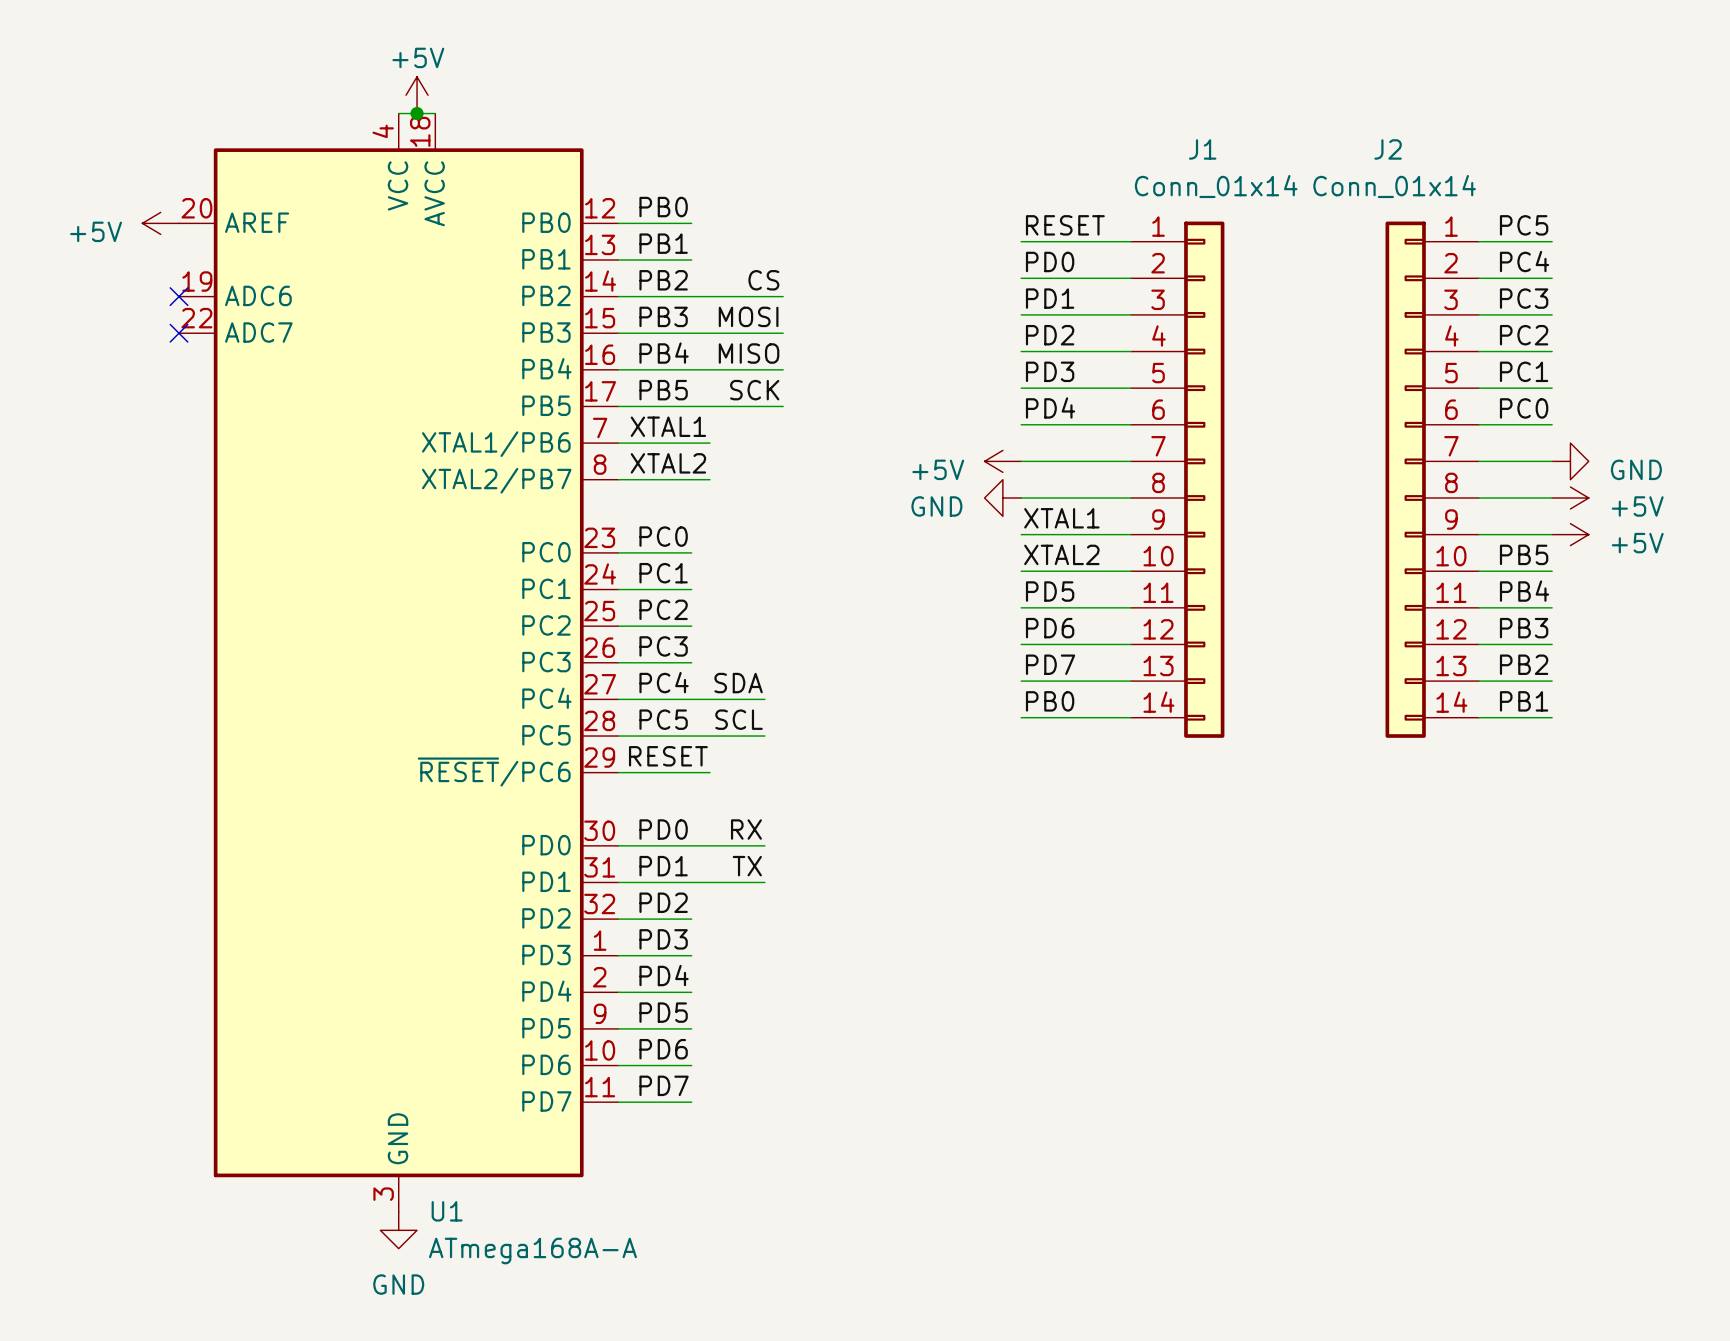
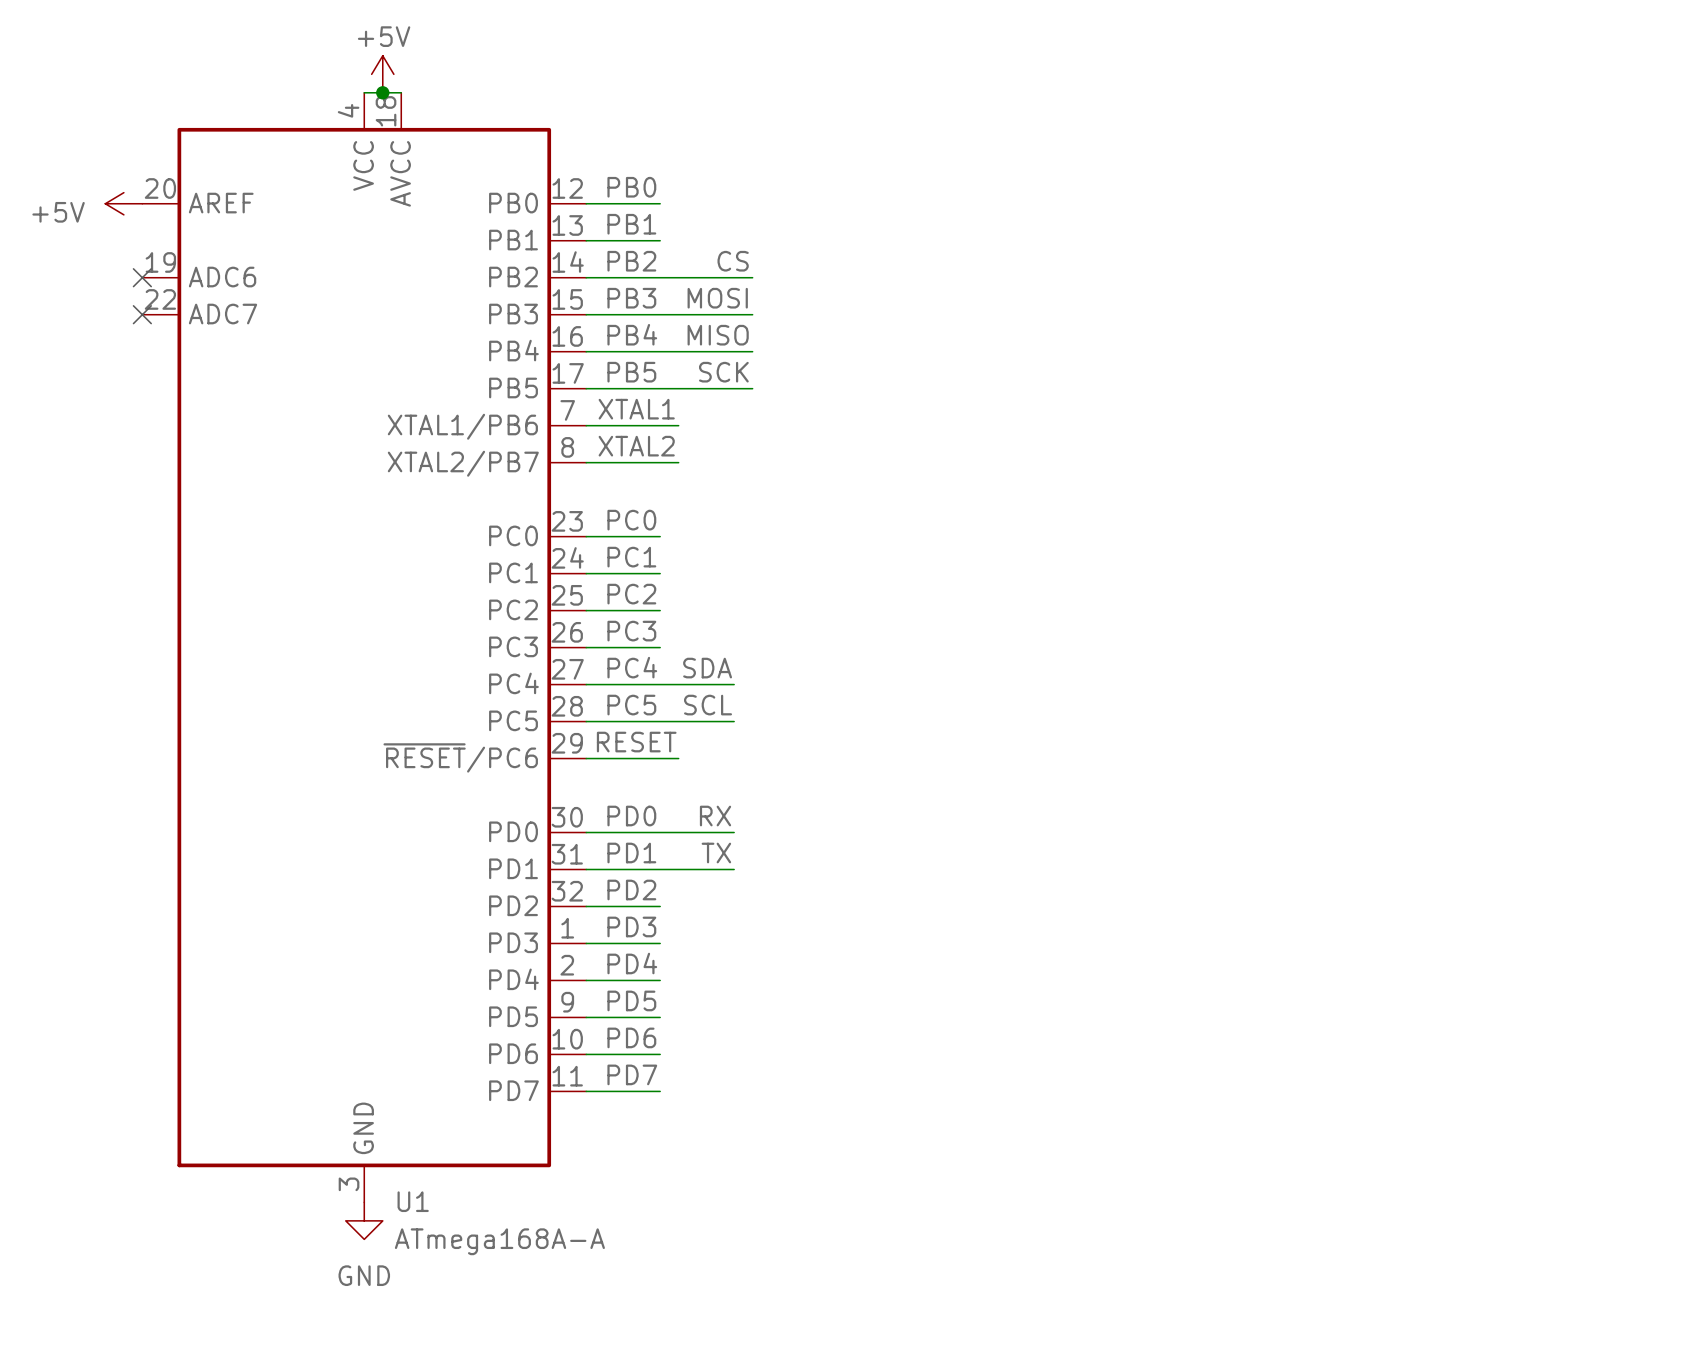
label: RESET (1065, 225) -> none
label: PC5 (1524, 225) -> none
wire: (1021, 241) (1131, 241) -> none
wire: (1478, 241) (1552, 241) -> none
label: PD0 (1050, 261) -> none
label: PC4 (1524, 261) -> none
wire: (1021, 278) (1131, 278) -> none
wire: (1478, 278) (1552, 278) -> none
label: PD1 (1050, 298) -> none
label: PC3 (1524, 298) -> none
wire: (1021, 314) (1131, 314) -> none
wire: (1478, 314) (1552, 314) -> none
label: PD2 (1050, 335) -> none
label: PC2 (1524, 335) -> none
wire: (1021, 351) (1131, 351) -> none
wire: (1478, 351) (1552, 351) -> none
label: PD3 (1050, 371) -> none
label: PC1 (1524, 371) -> none
wire: (1021, 388) (1131, 388) -> none
wire: (1478, 388) (1552, 388) -> none
label: PD4 (1050, 408) -> none
label: PC0 (1524, 408) -> none
wire: (1021, 424) (1131, 424) -> none
wire: (1478, 424) (1552, 424) -> none
power symbol: +5V (1002, 461) -> none
wire: (1021, 461) (1131, 461) -> none
wire: (1478, 461) (1552, 461) -> none
power symbol: GND (1570, 461) -> none
J1: Conn_01x14 (1177, 479) -> none
J2: Conn_01x14 (1432, 479) -> none
power symbol: GND (1002, 498) -> none
wire: (1021, 498) (1131, 498) -> none
wire: (1478, 498) (1552, 498) -> none
power symbol: +5V (1570, 498) -> none
label: XTAL1 (1061, 518) -> none
wire: (1021, 534) (1131, 534) -> none
wire: (1478, 534) (1552, 534) -> none
power symbol: +5V (1570, 534) -> none
label: XTAL2 (1061, 554) -> none
label: PB5 (1524, 554) -> none
wire: (1021, 571) (1131, 571) -> none
wire: (1478, 571) (1552, 571) -> none
label: PD5 (1050, 591) -> none
label: PB4 (1524, 591) -> none
wire: (1021, 607) (1131, 607) -> none
wire: (1478, 607) (1552, 607) -> none
label: PD6 (1050, 628) -> none
label: PB3 (1524, 628) -> none
wire: (1021, 644) (1131, 644) -> none
wire: (1478, 644) (1552, 644) -> none
label: PD7 (1050, 664) -> none
label: PB2 (1524, 664) -> none
wire: (1021, 681) (1131, 681) -> none
wire: (1478, 681) (1552, 681) -> none
label: PB0 (1050, 701) -> none
label: PB1 (1524, 701) -> none
wire: (1021, 717) (1131, 717) -> none
wire: (1478, 717) (1552, 717) -> none

